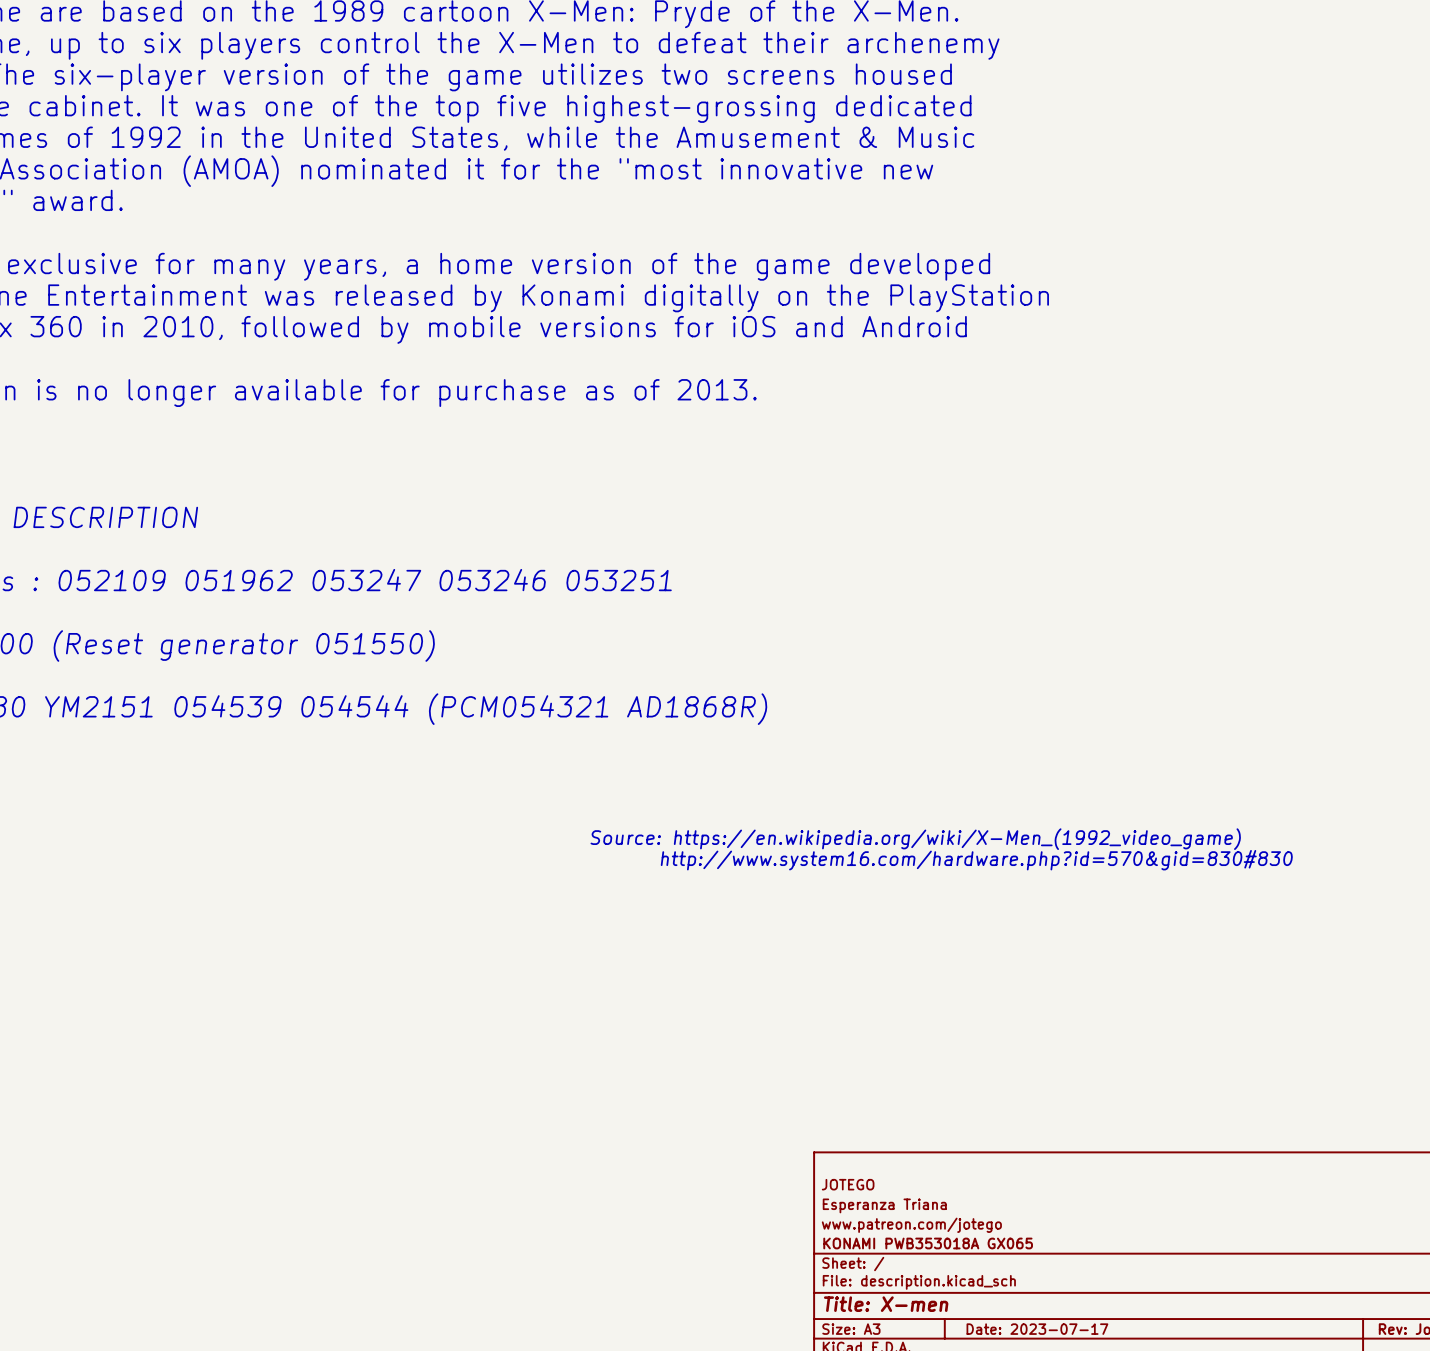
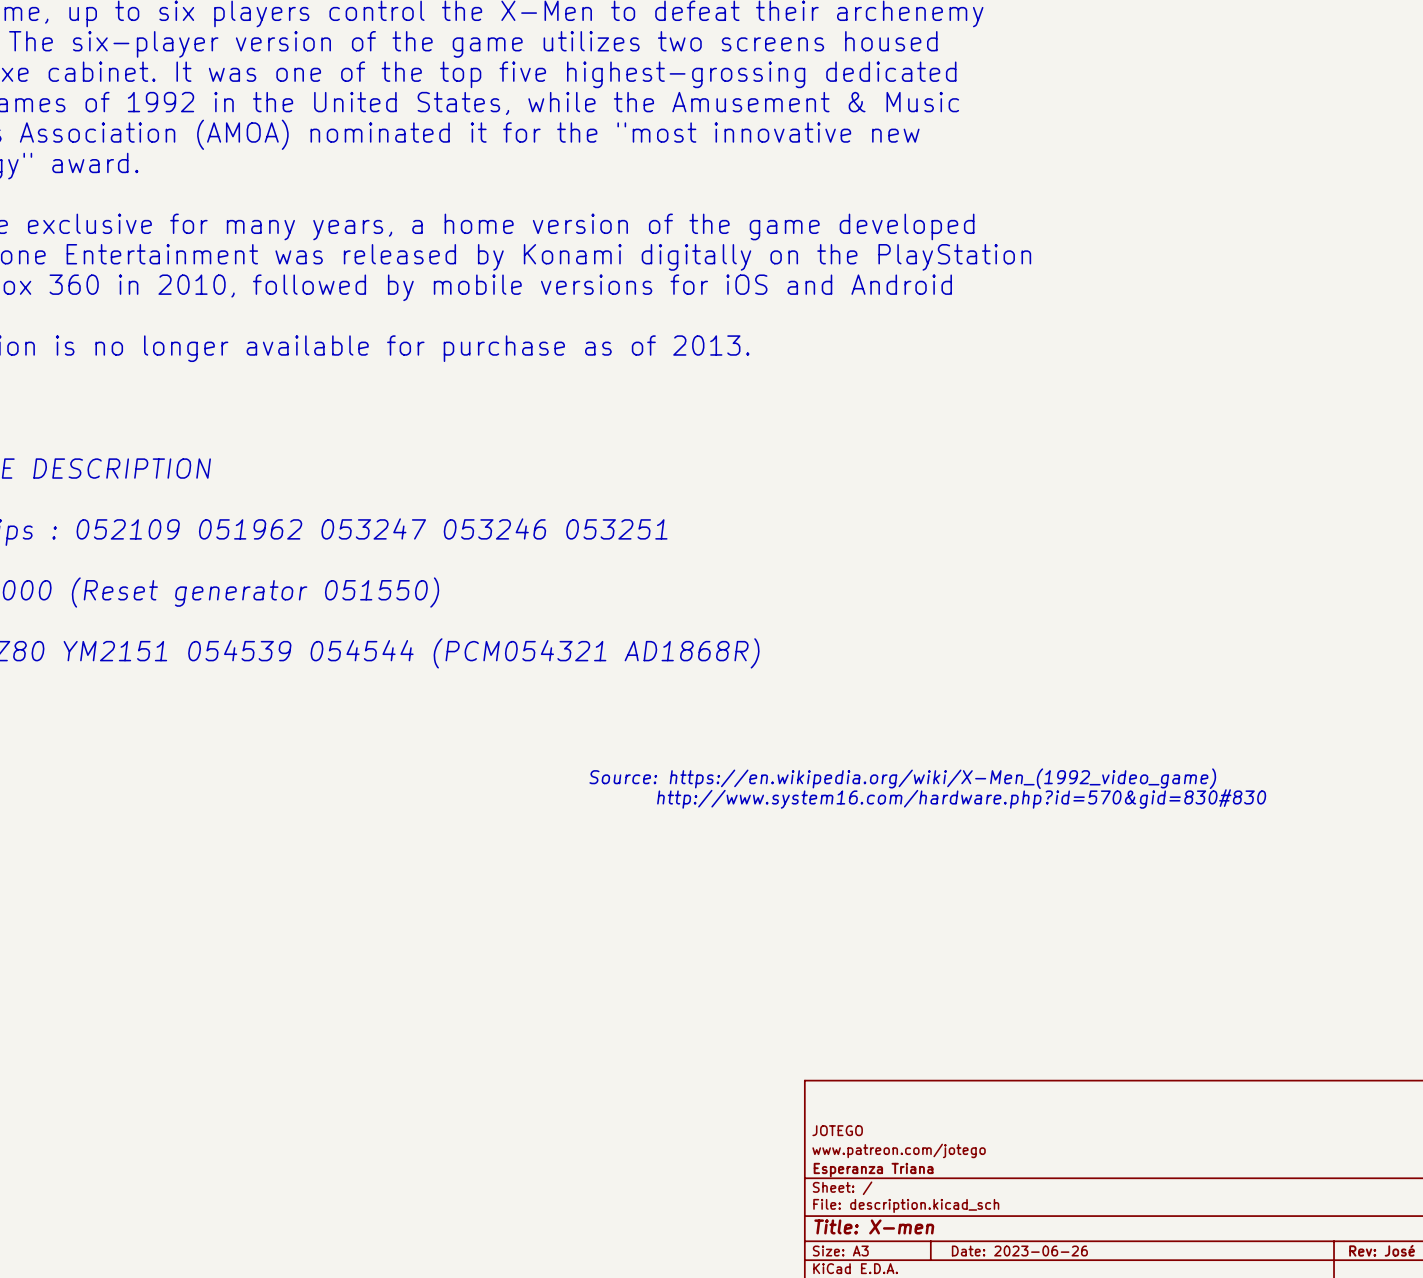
title block: JOTEGO (848, 1184) -> none
title block: Esperanza Triana (884, 1205) -> JOTEGO (837, 1130)
title block: KONAMI PWB353018A GX065 (928, 1243) -> Esperanza Triana (873, 1170)
title block: Date: 2023-07-17 (1037, 1329) -> Date: 2023-06-26 (1019, 1250)

